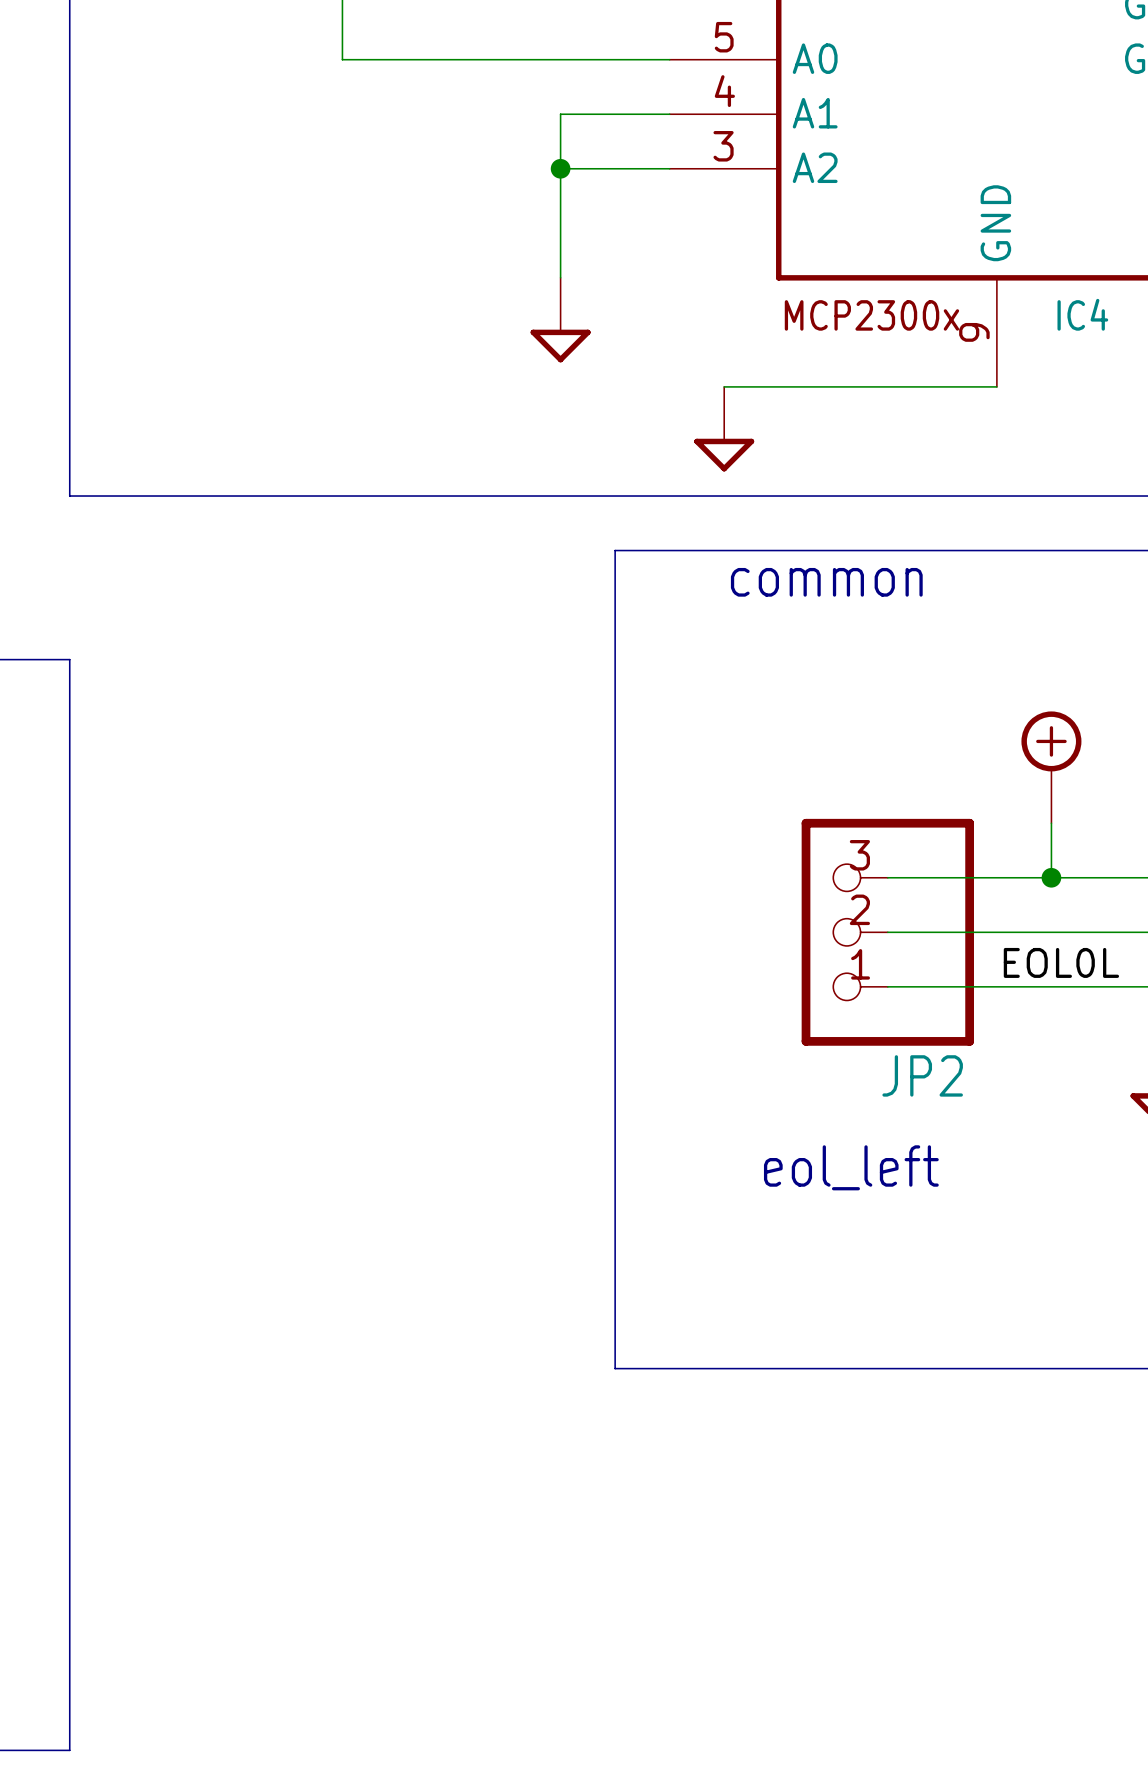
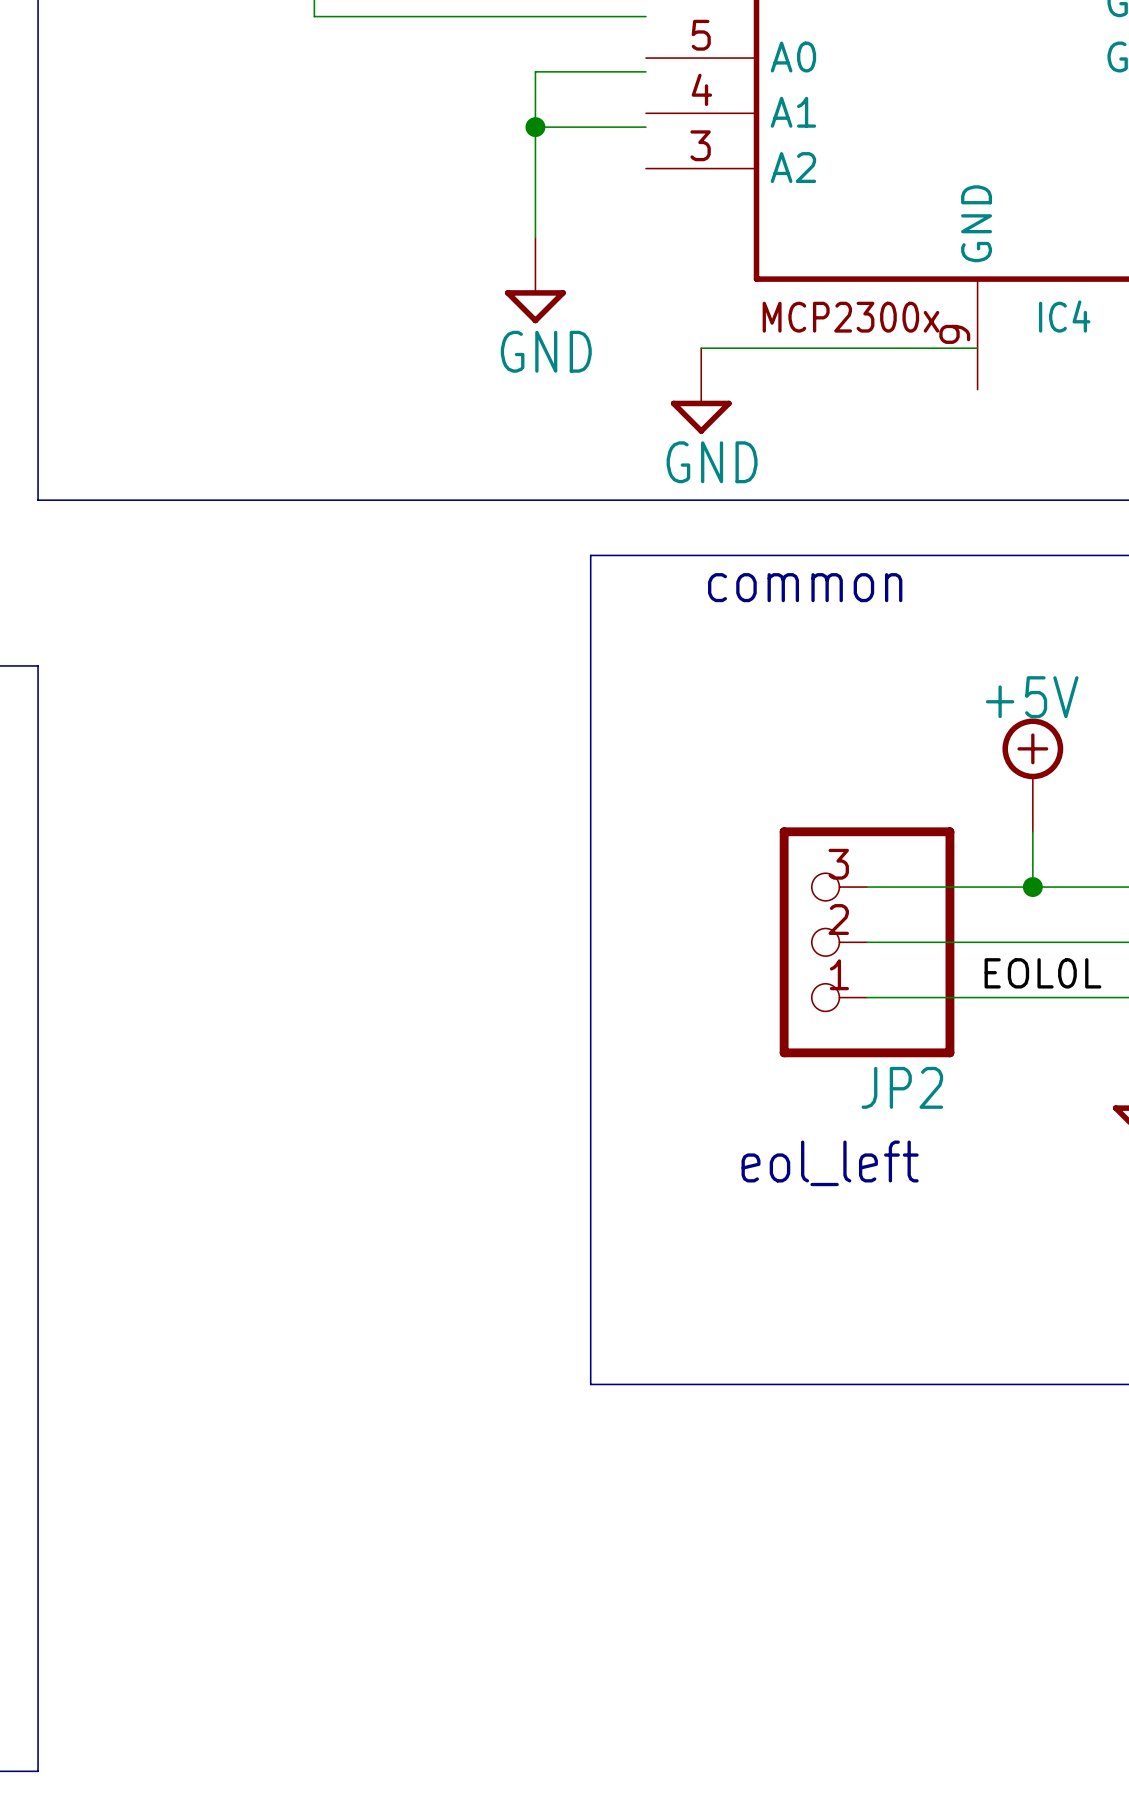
wire: (342, 18) (342, 59) (669, 59) -> (314, 16) (645, 16)
wire: (560, 114) (669, 114) -> (535, 113) (535, 71) (645, 71)
wire: (560, 168) (669, 168) -> (535, 127) (645, 127)
junction position: (560, 168) -> (535, 127)
power symbol: none -> GND (535, 280)
power symbol: (560, 320) -> none
wire: (724, 386) (996, 386) -> (701, 348) (977, 348)
power symbol: none -> GND (701, 391)
power symbol: (724, 429) -> none
power symbol text: none -> +5V (1032, 697)
text position: eol_left (851, 1167) -> eol_left (830, 1163)

